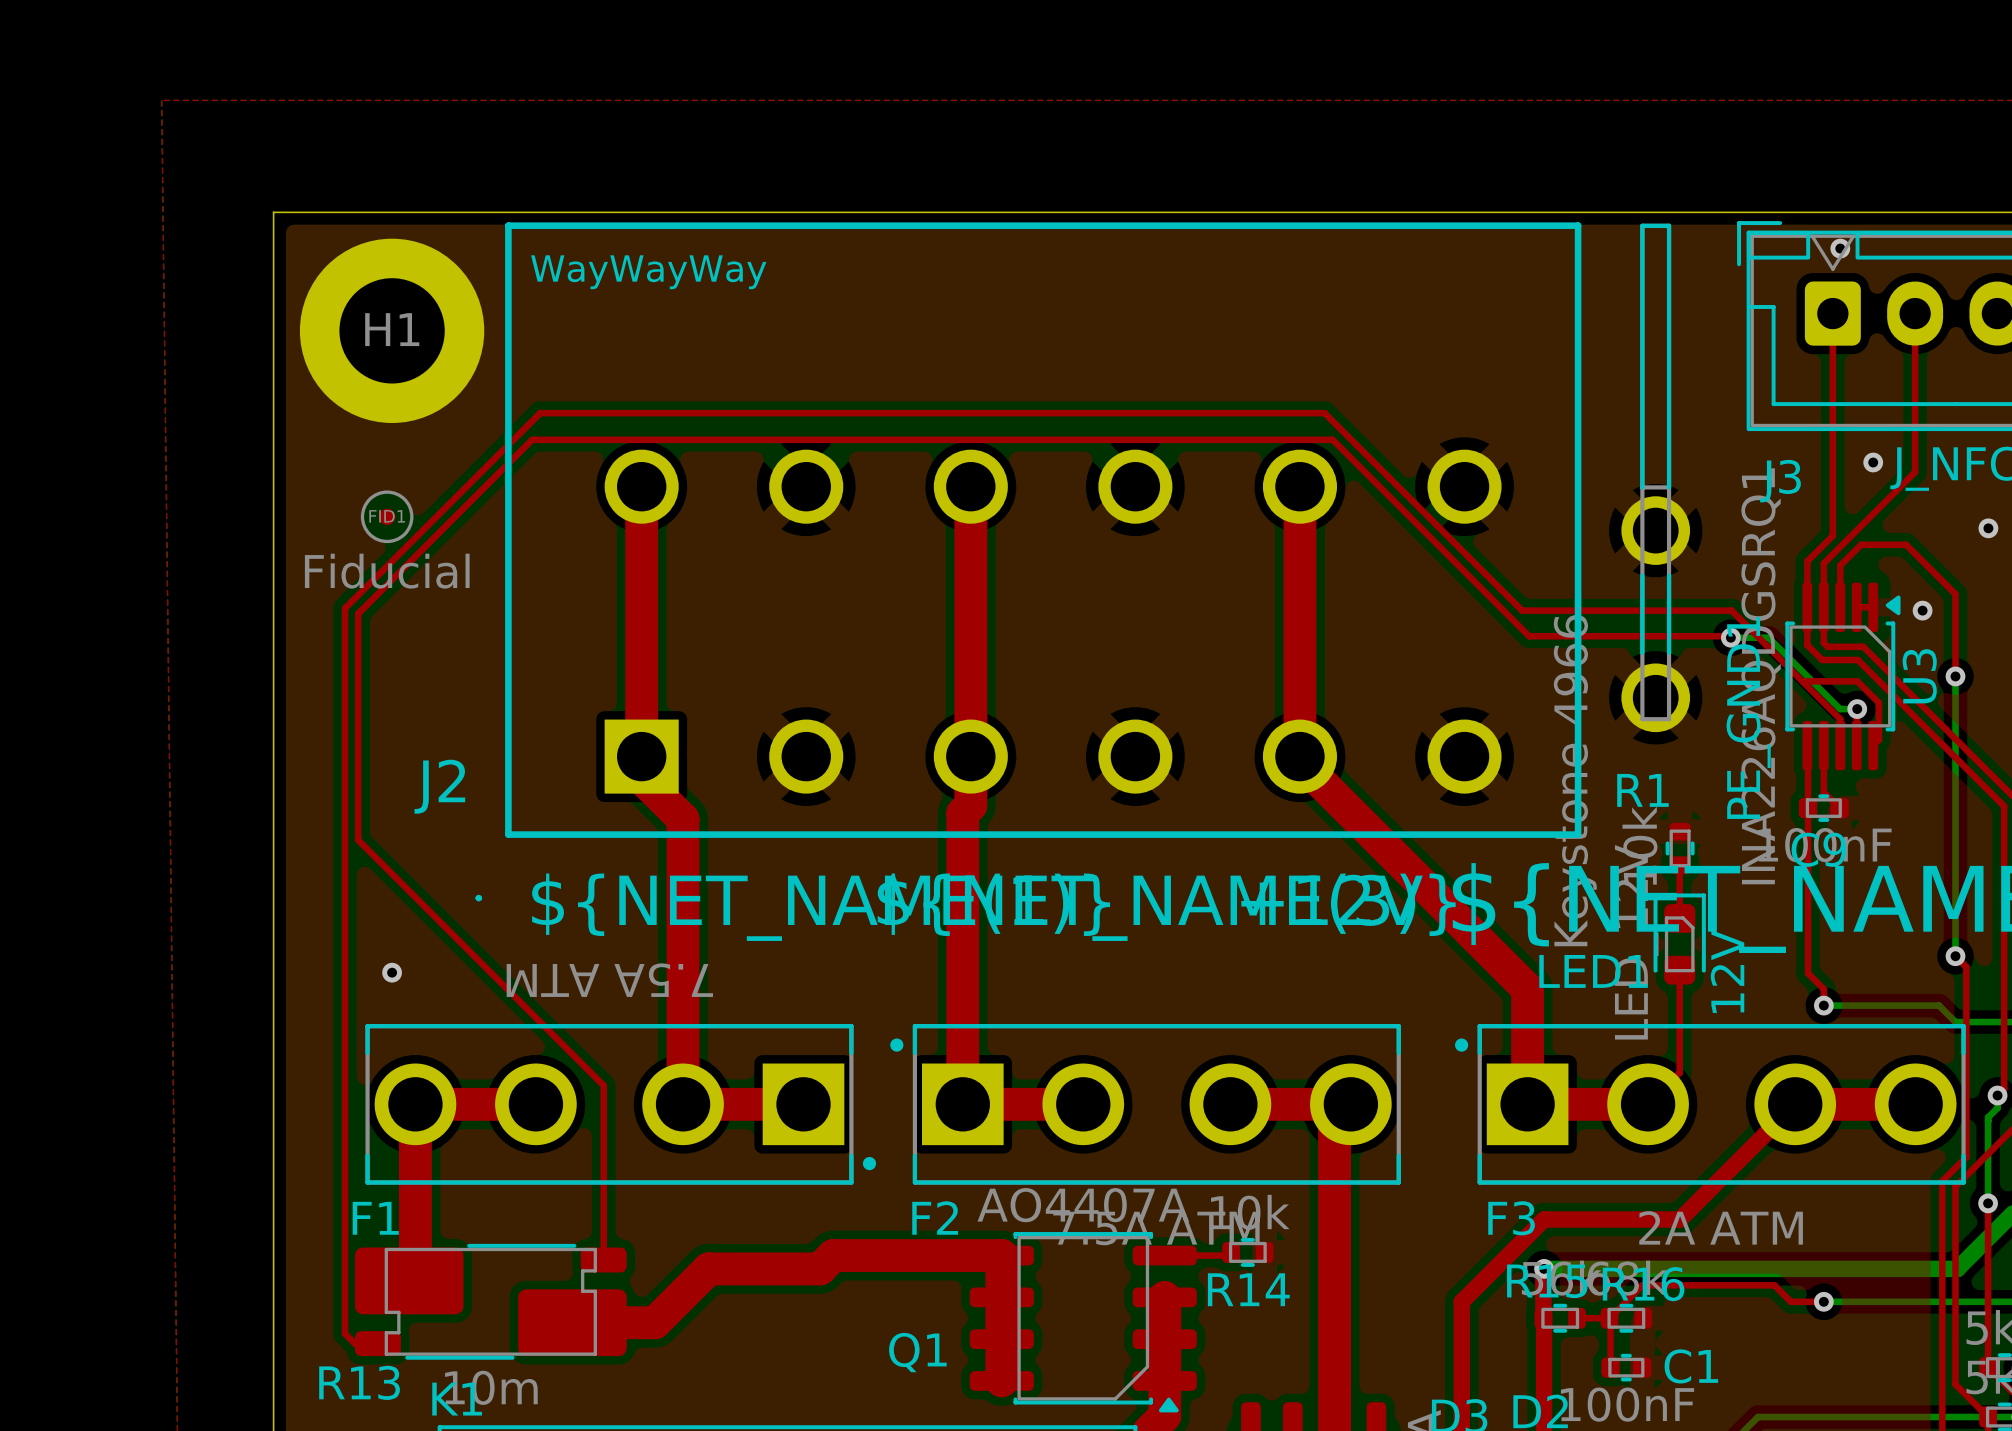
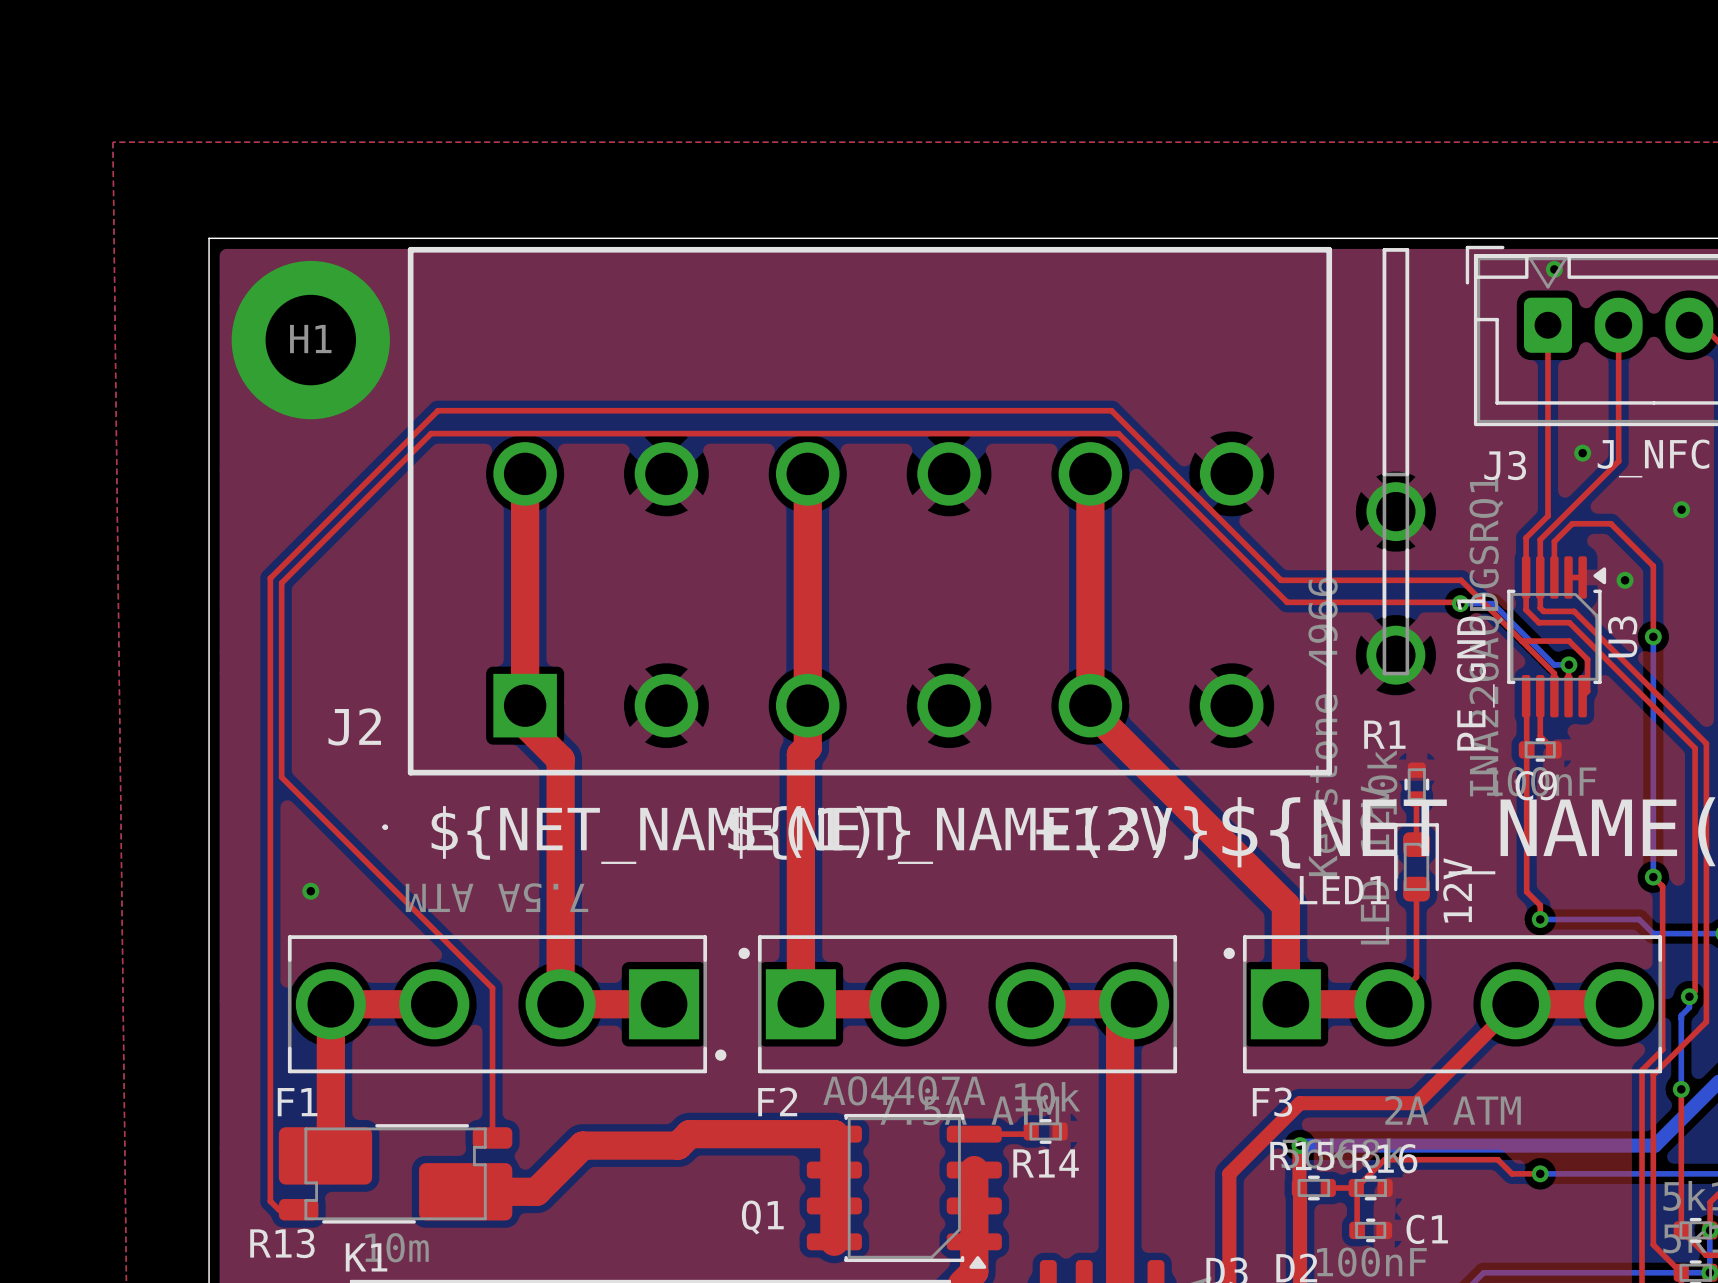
text: WayWayWay (648, 272) -> none
FID1: Fiducial (387, 516) -> none

